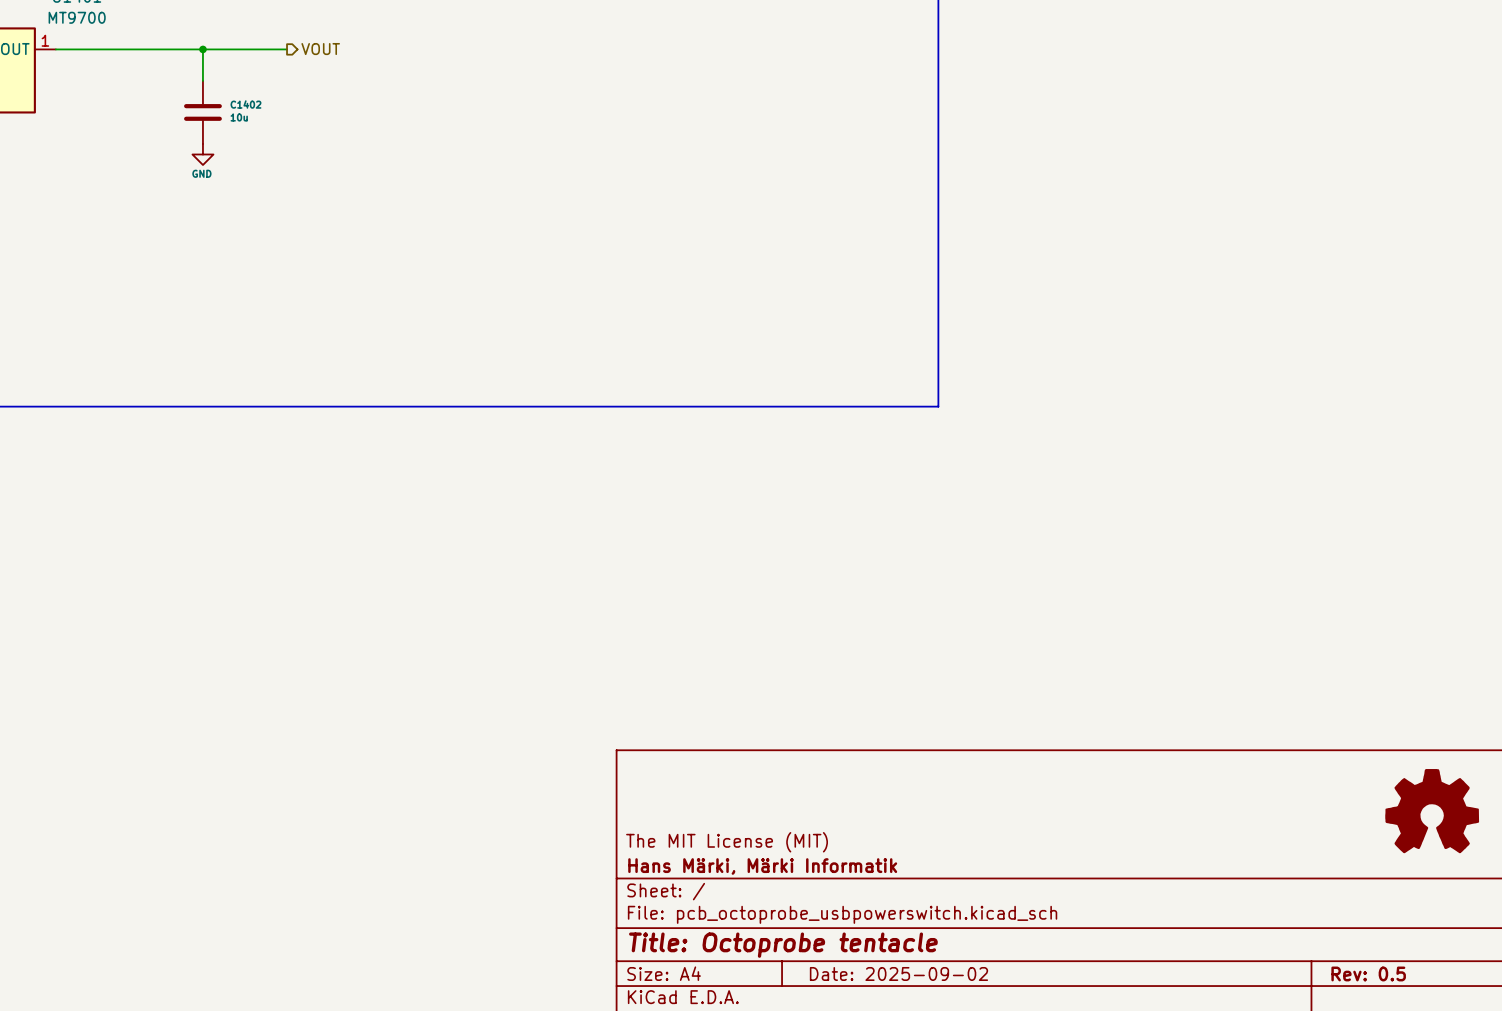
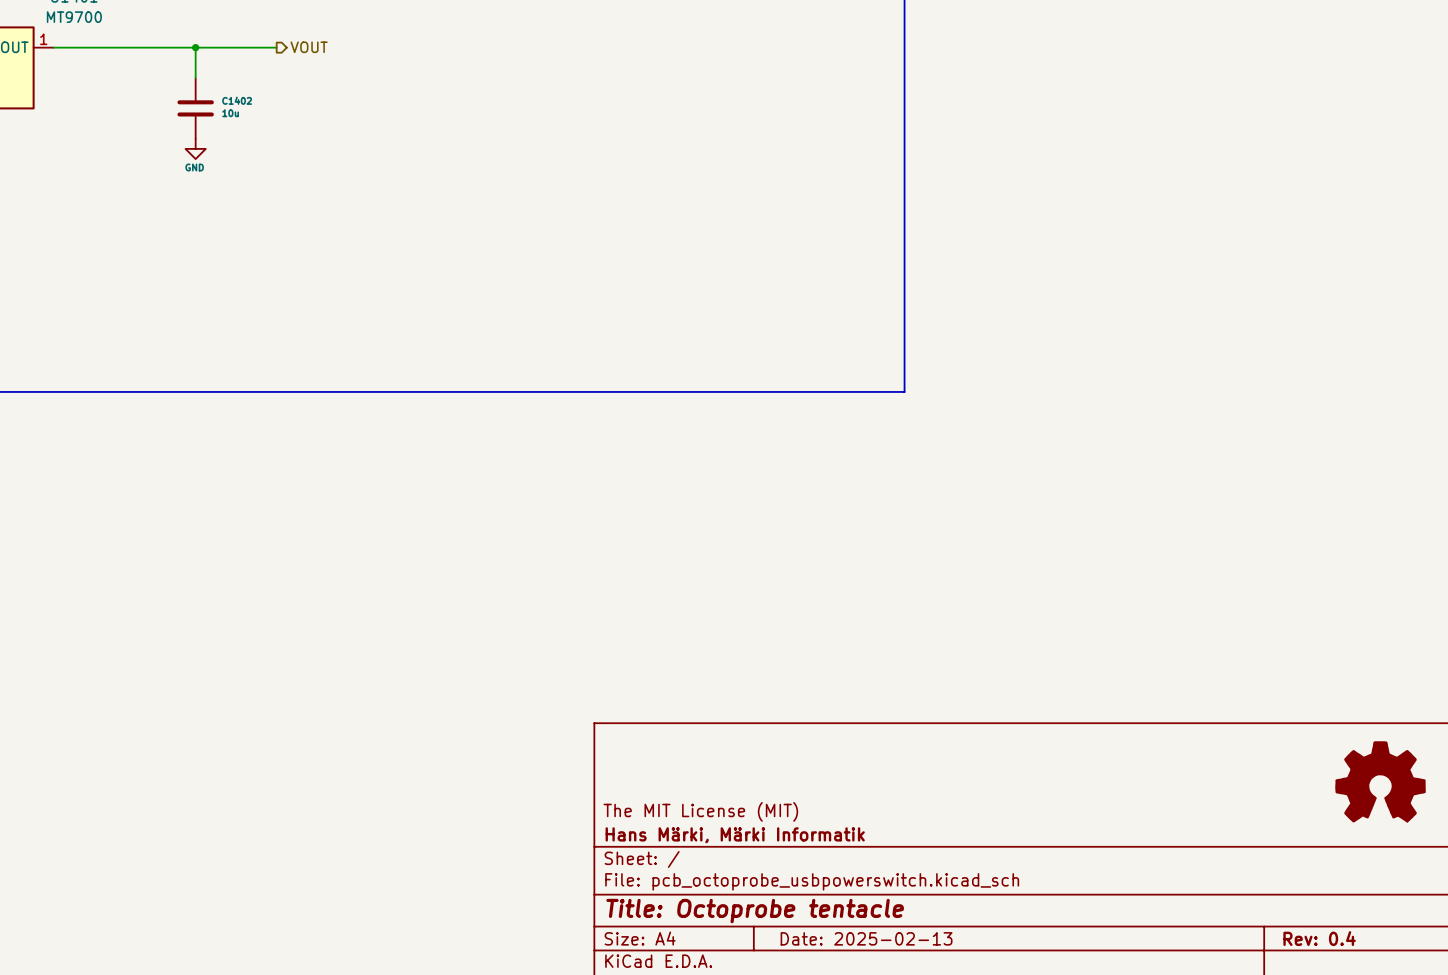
title block: Date: 2025-09-02 (898, 973) -> Date: 2025-02-13 (866, 938)
title block: Rev: 0.5 (1368, 973) -> Rev: 0.4 (1319, 938)

